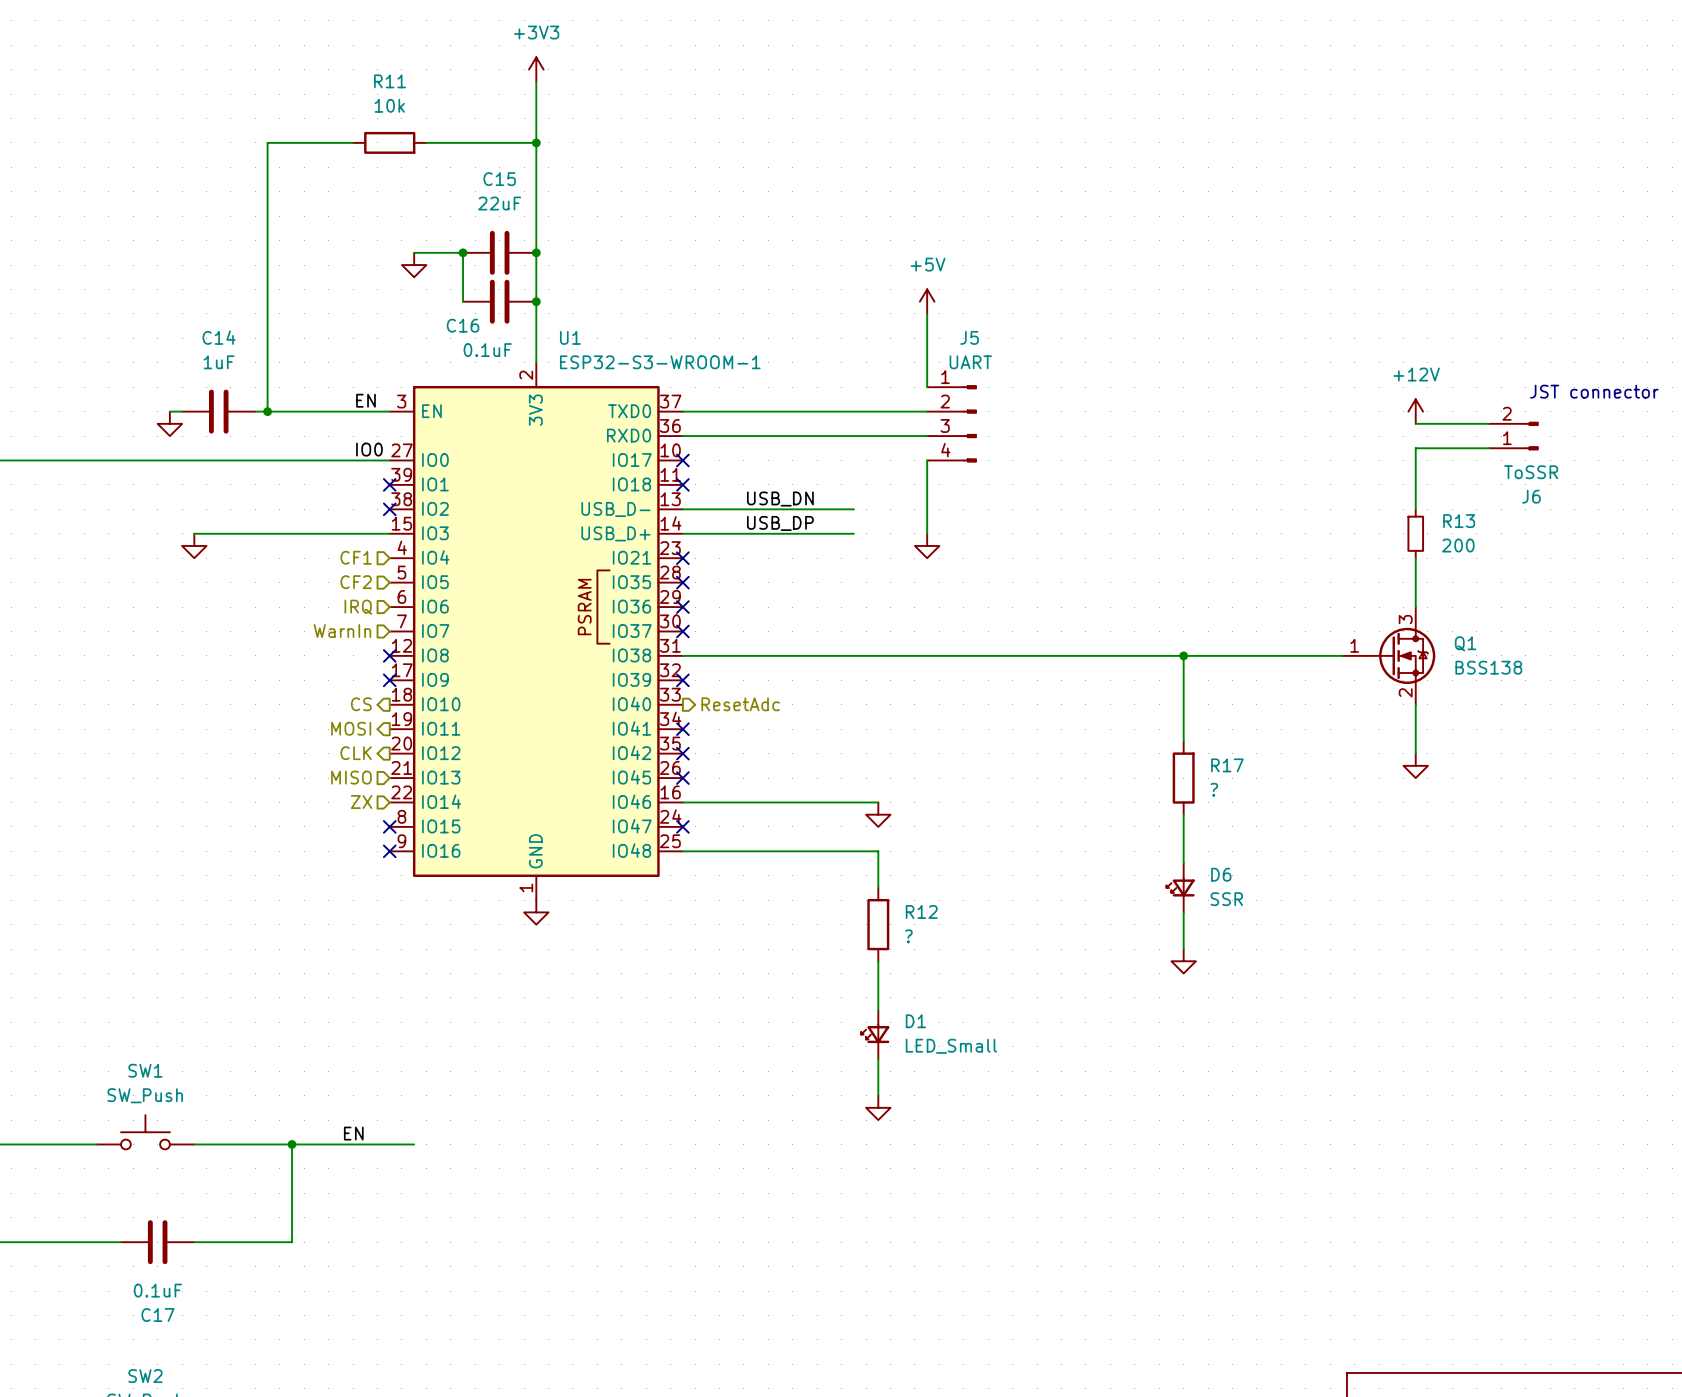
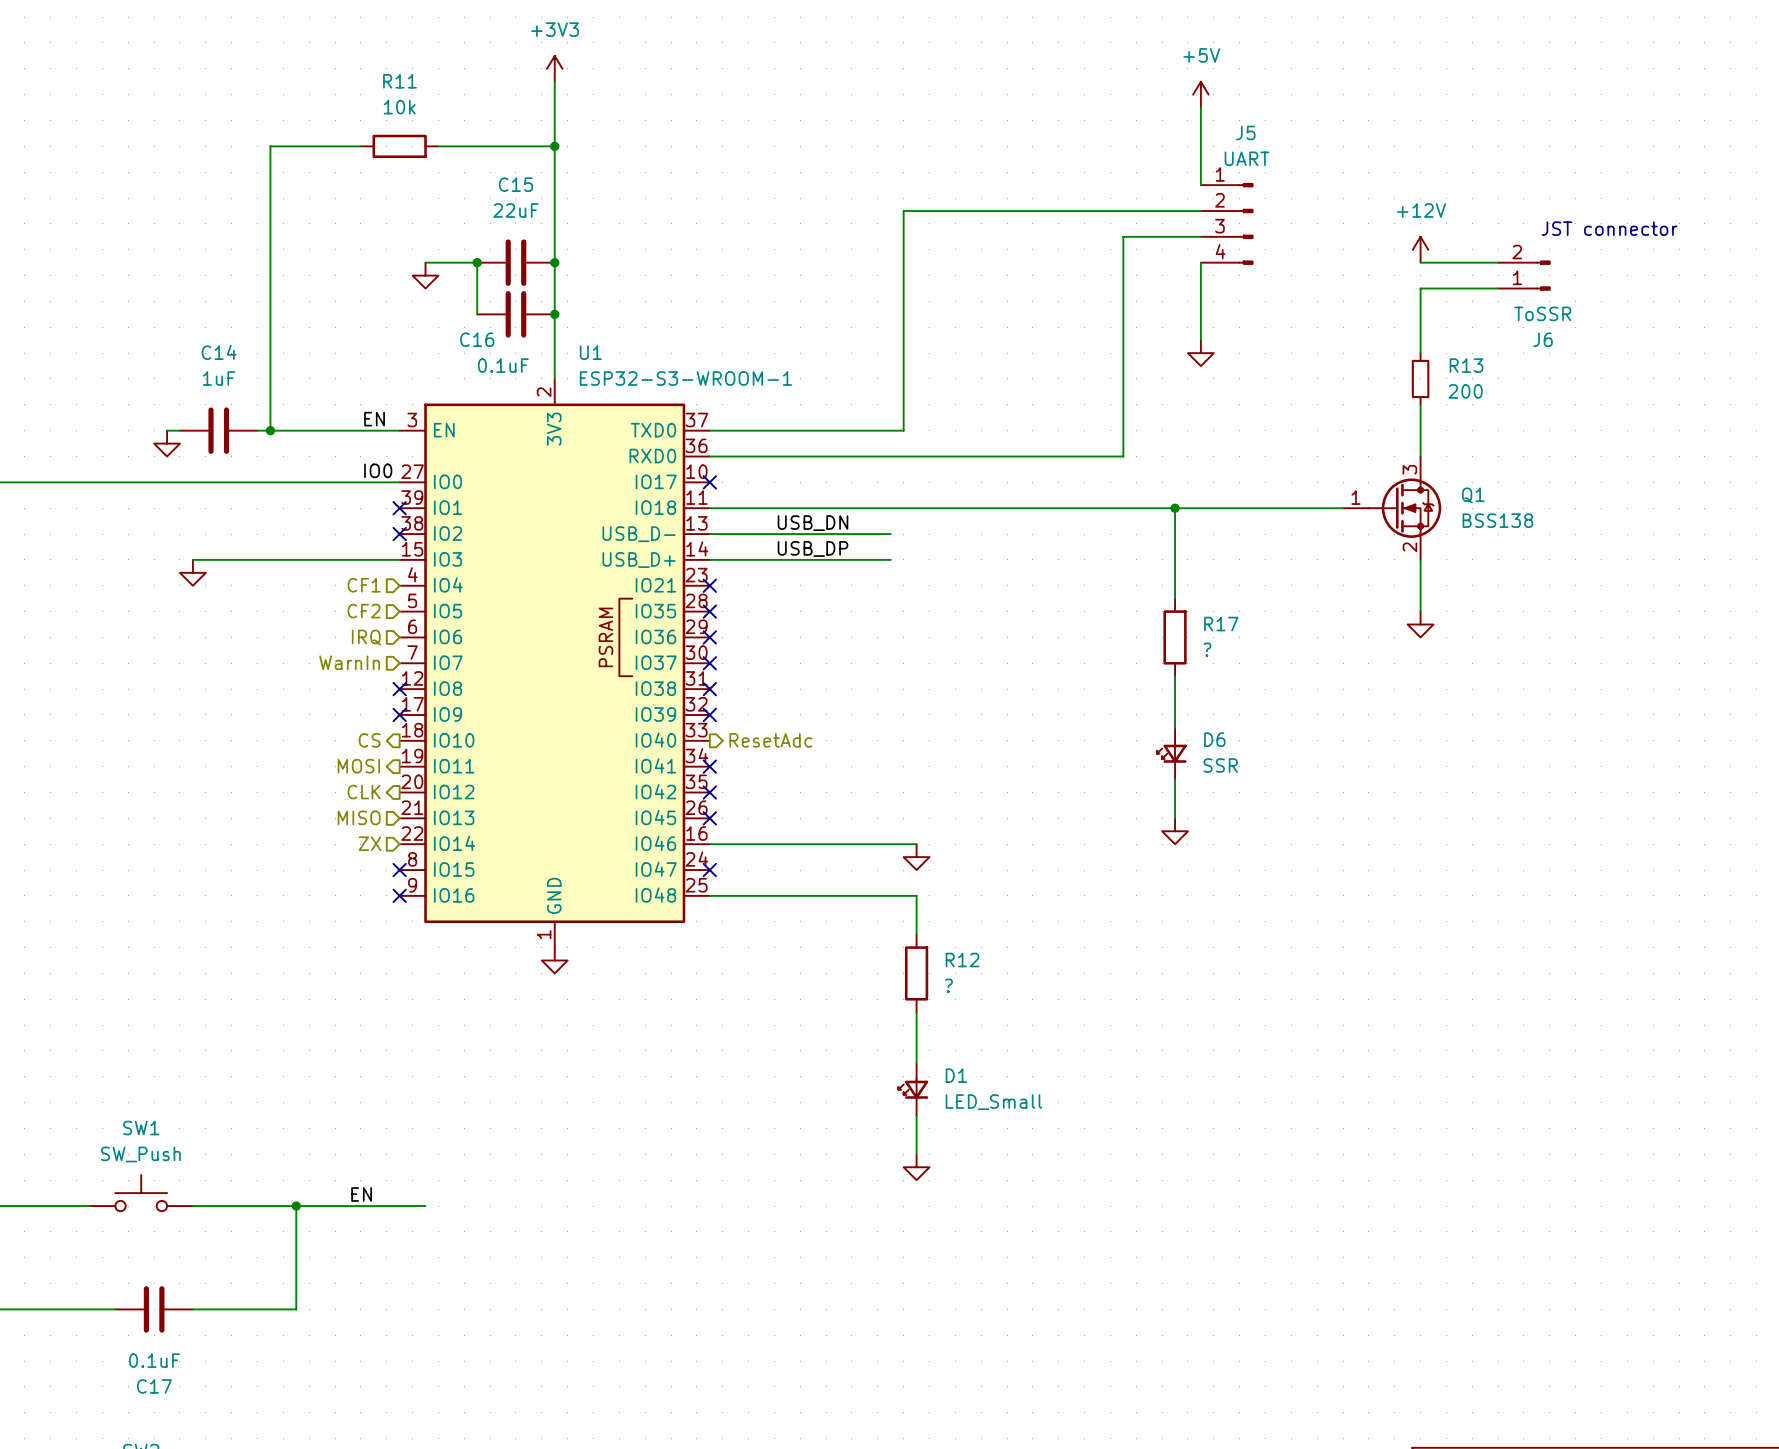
power symbol: none -> +5V (1200, 94)
wire: none -> (1200, 107) (1200, 185)
wire: none -> (1200, 236) (1123, 236) (1123, 456) (968, 456)
power symbol: +5V (927, 301) -> none
wire: (927, 313) (927, 387) -> (1200, 262) (1200, 340)
power symbol: none -> (1200, 353)
text position: JST connector (1594, 391) -> JST connector (1609, 228)
wire: (866, 411) (927, 411) -> (903, 430) (903, 210) (1200, 210)
power symbol position: +12V (1415, 411) -> +12V (1420, 249)
J5 position: (951, 423) -> (1227, 223)
wire: (1415, 423) (1489, 423) -> (1420, 262) (1498, 262)
J6 position: (1513, 436) -> (1524, 275)
wire: (1489, 448) (1415, 448) (1415, 509) -> (1498, 288) (1420, 288) (1420, 353)
wire: (927, 460) (927, 533) -> none
wire: none -> (709, 508) (1343, 508)
no-connect mark: (682, 484) -> none
junction: none -> (1175, 508)
R13 position: (1415, 533) -> (1420, 378)
power symbol: (927, 545) -> none
wire: (1415, 558) (1415, 607) -> (1420, 404) (1420, 456)
power symbol: none -> (1420, 624)
wire: (682, 655) (1342, 655) -> none
no-connect mark: none -> (709, 689)
wire: (1183, 655) (1183, 741) -> (1175, 508) (1175, 598)
junction: (1183, 655) -> none
Q1 position: (1388, 655) -> (1392, 508)
wire: (1415, 704) (1415, 753) -> (1420, 559) (1420, 611)
power symbol: (1415, 765) -> none
R17 position: (1183, 778) -> (1175, 637)
power symbol: none -> (1175, 831)
wire: (1183, 814) (1183, 863) -> (1175, 676) (1175, 727)
D6 position: (1180, 887) -> (1171, 753)
wire: (1183, 912) (1183, 949) -> (1175, 779) (1175, 818)
power symbol: (1183, 961) -> none

